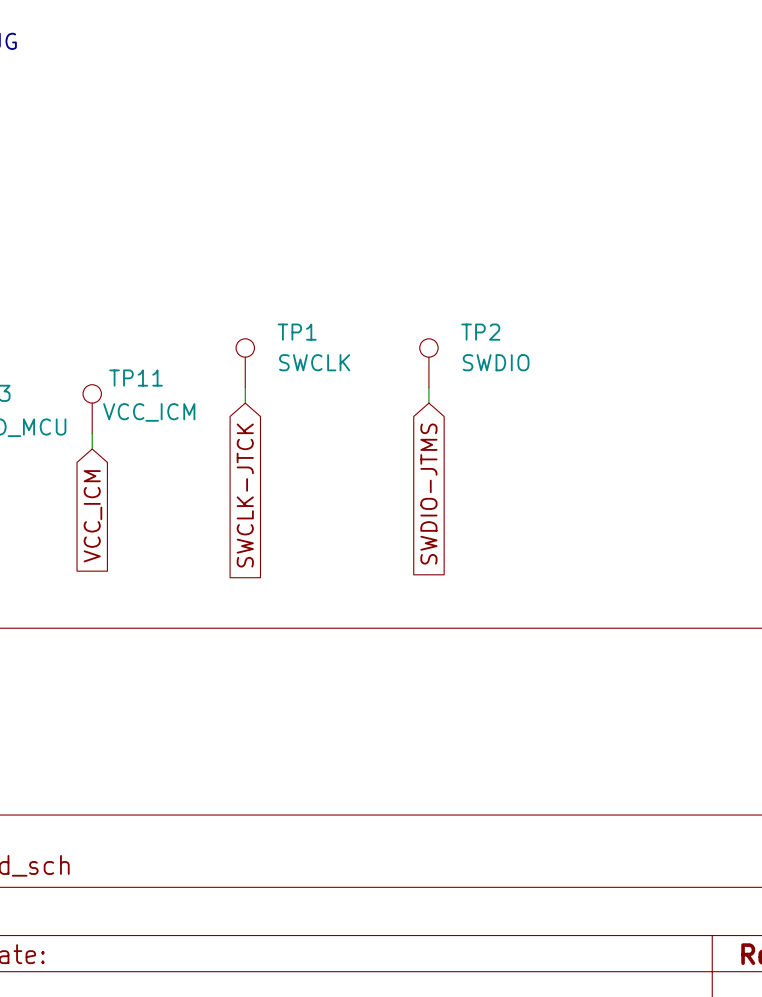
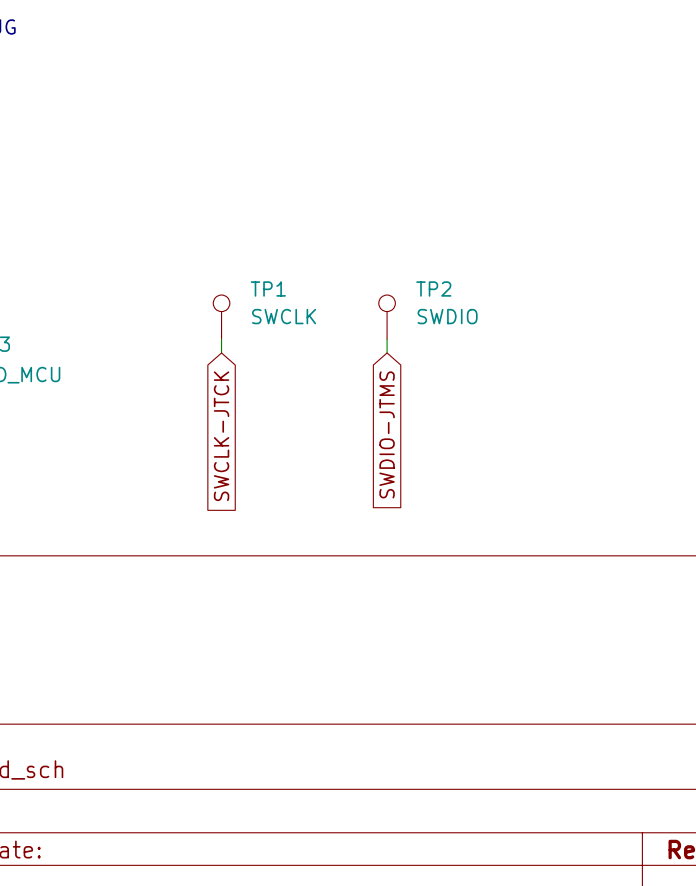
TP11: VCC_ICM (92, 409) -> none
wire: (92, 433) (92, 449) -> none
global label: VCC_ICM (92, 516) -> none

